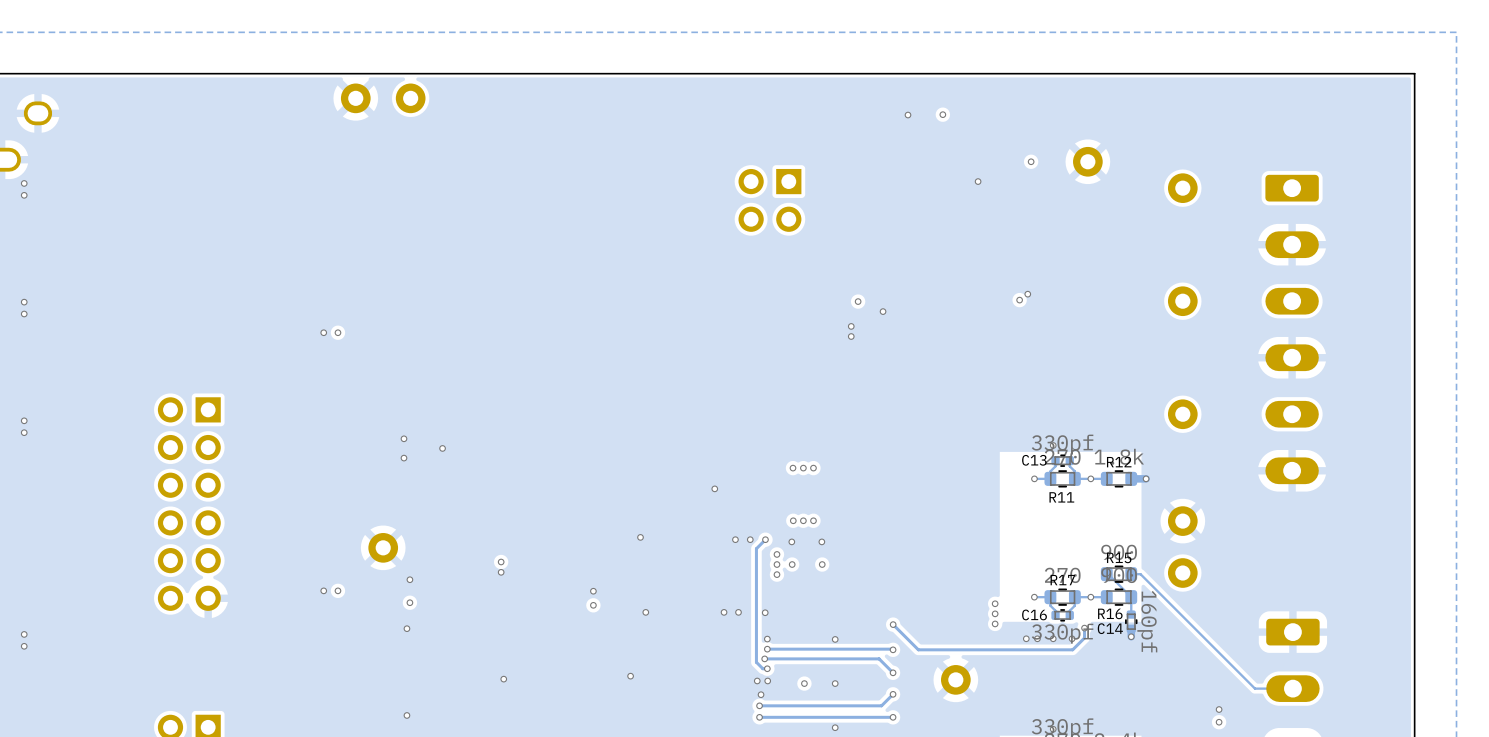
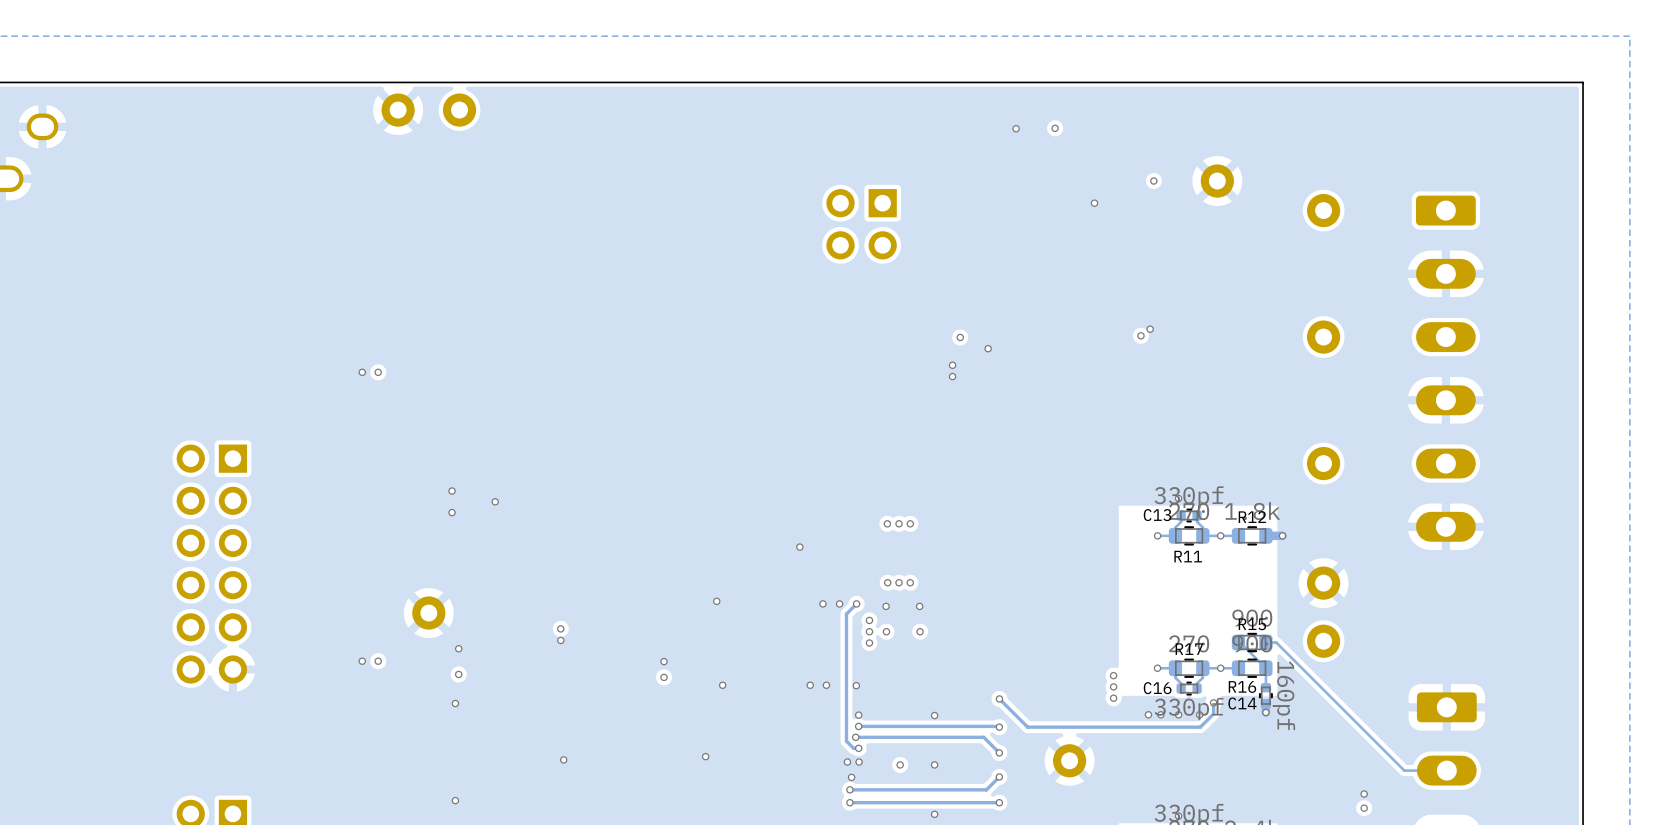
via: (24, 183) -> none
via: (24, 195) -> none
via: (24, 302) -> none
via: (24, 314) -> none
via: (24, 420) -> none
via: (24, 432) -> none
via: (24, 634) -> none
via: (24, 646) -> none

